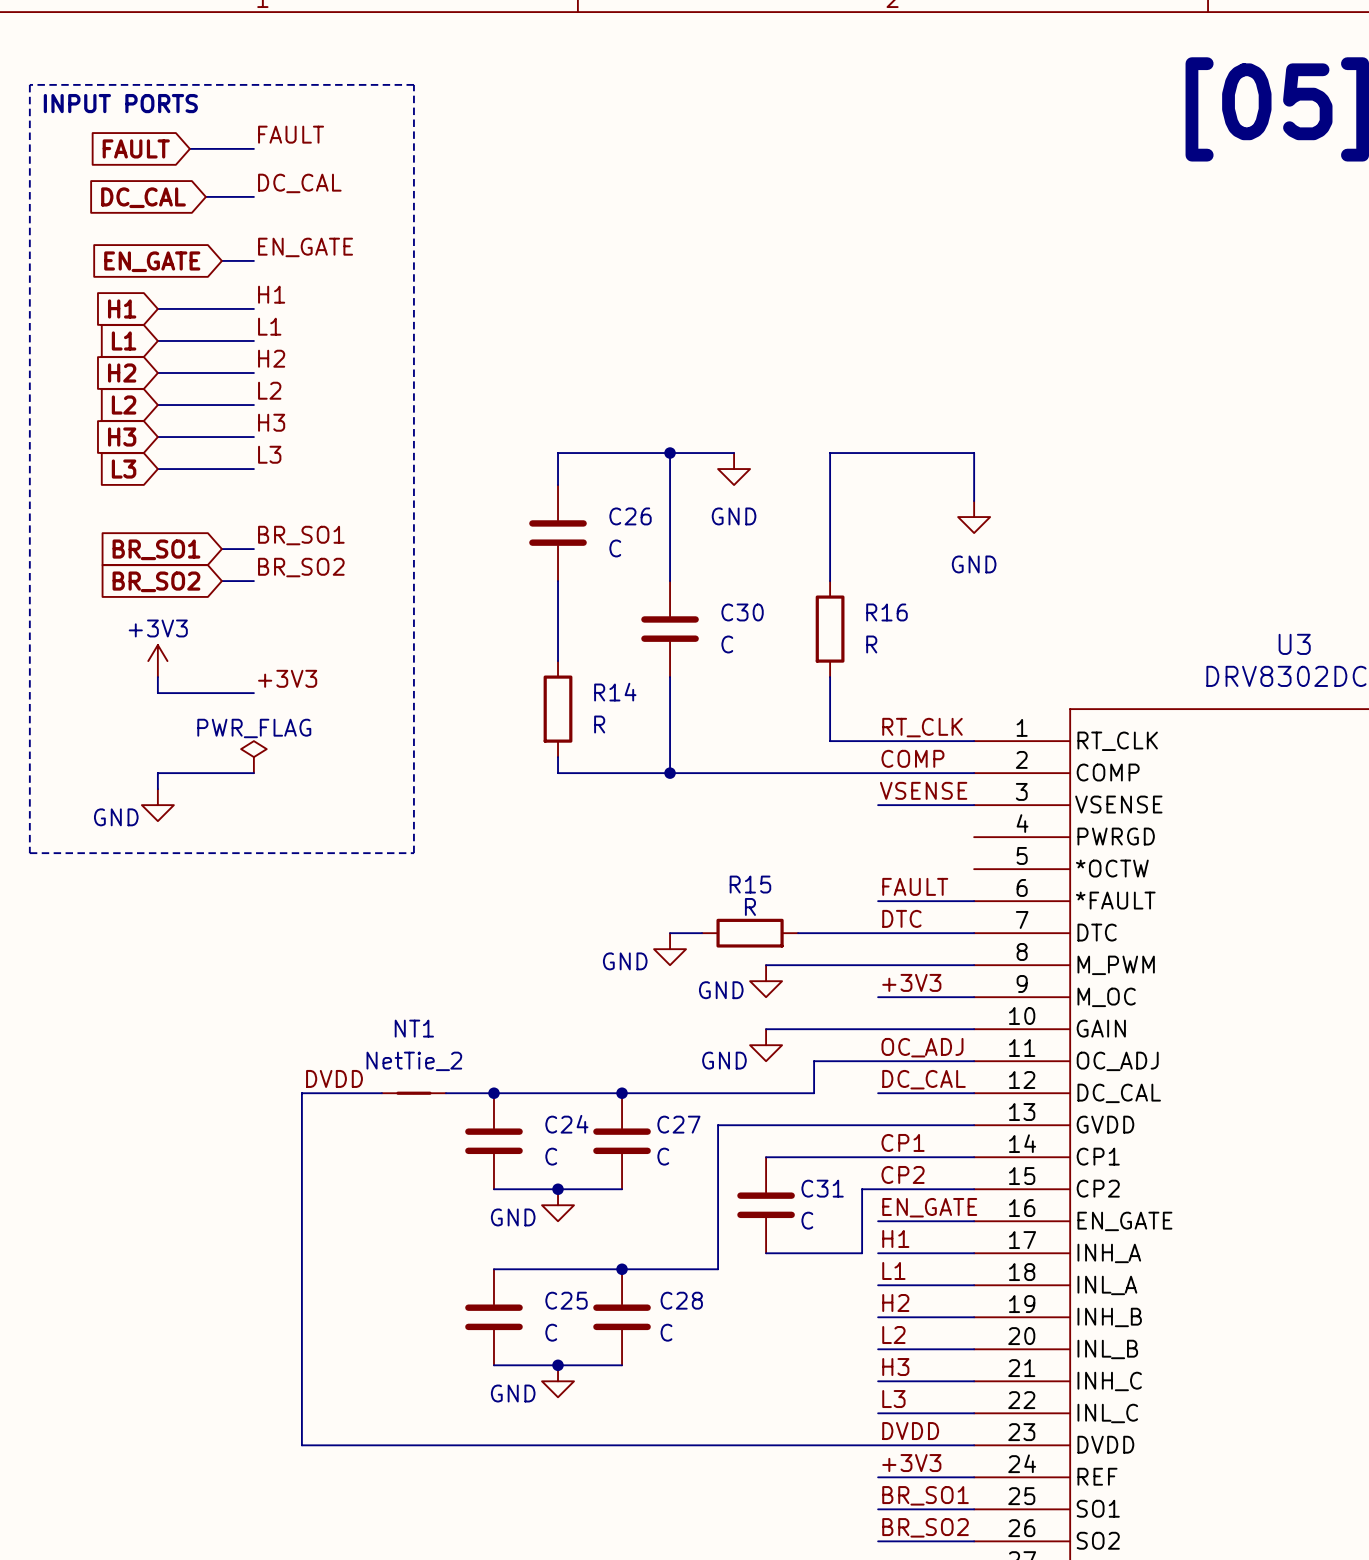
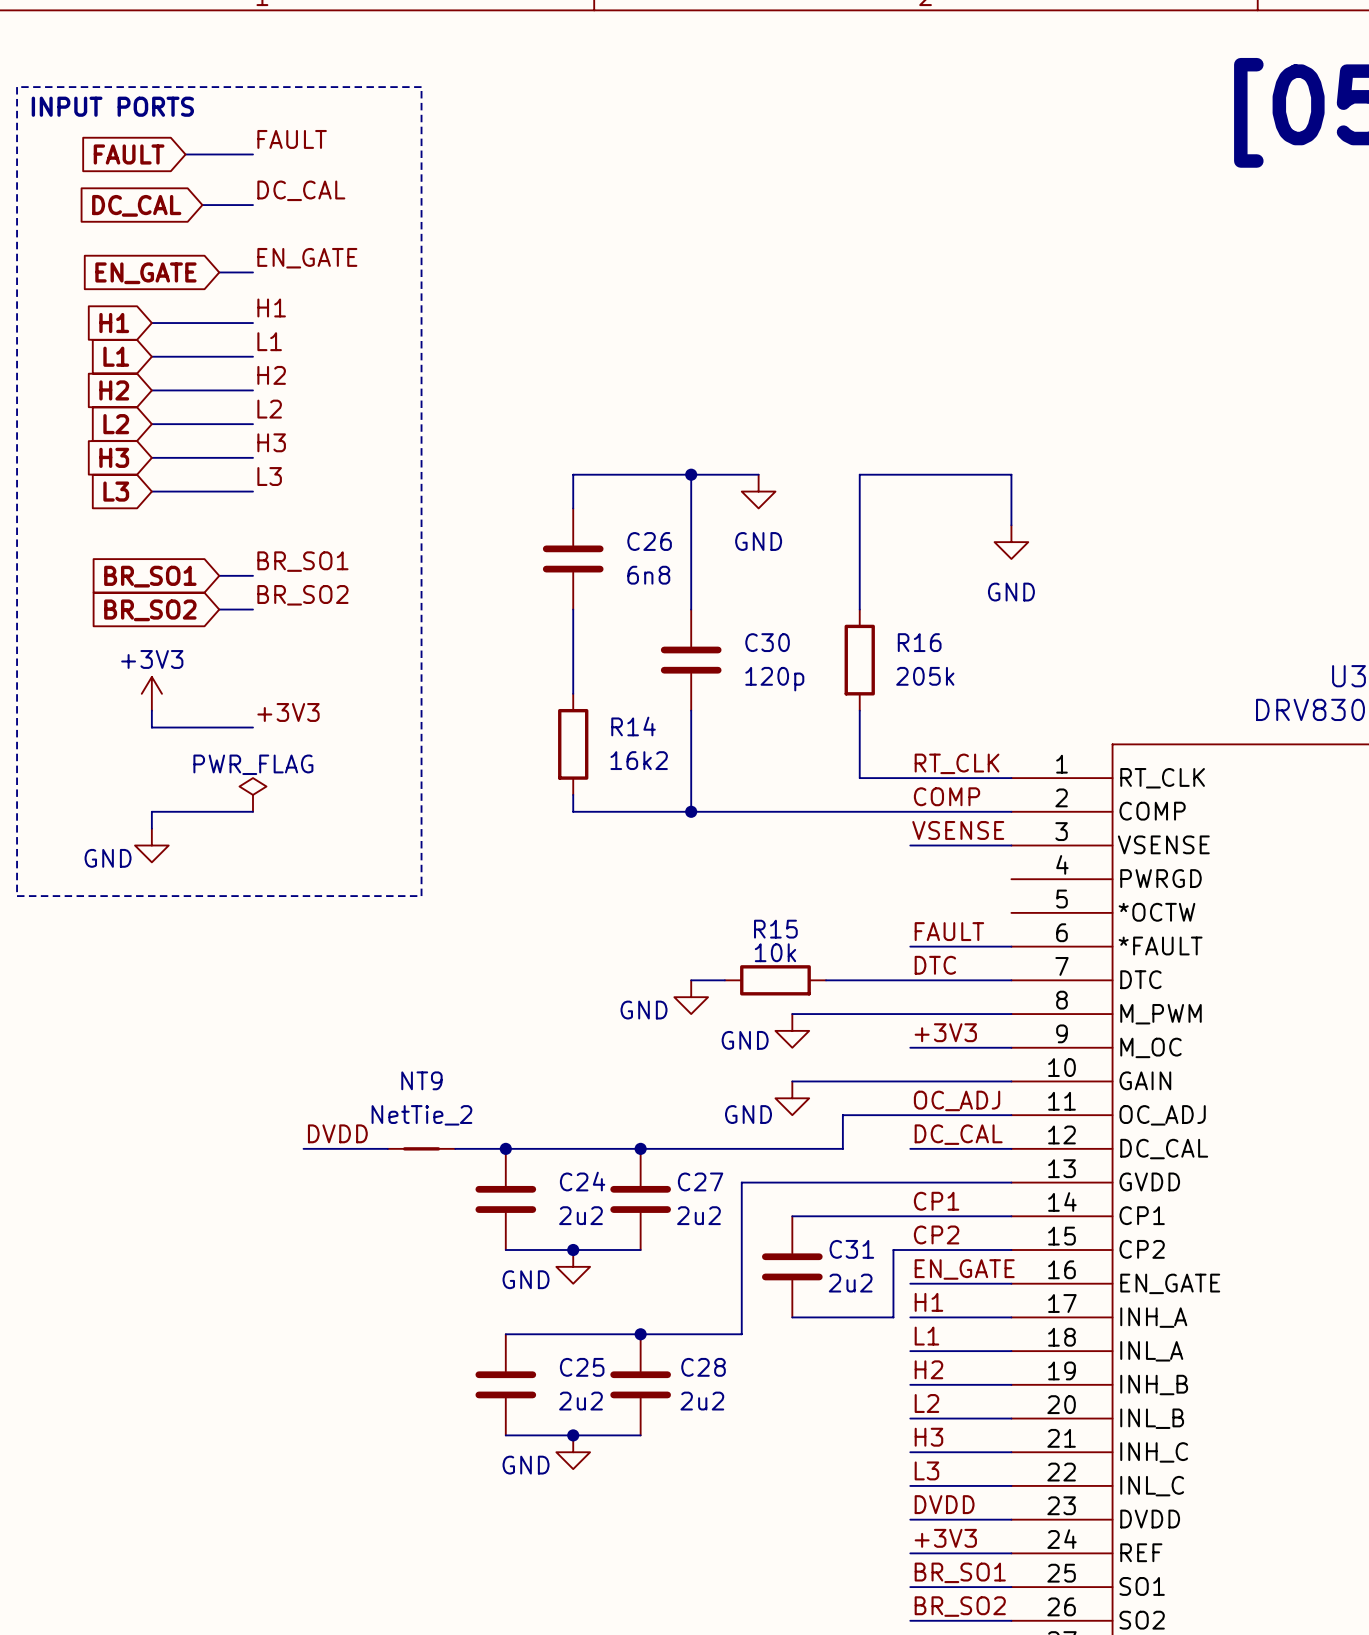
C26 value: C (615, 548) -> 6n8 (648, 575)
C30 value: C (727, 644) -> 120p (774, 679)
R16 value: R (871, 644) -> 205k (925, 676)
R14 value: R (599, 724) -> 16k2 (639, 760)
R15 value: R (750, 906) -> 10k (775, 952)
NT1 name: NT1 (414, 1028) -> NT9 (421, 1080)
wire: (301, 1093) (301, 1445) (878, 1445) -> none
C24 value: C (551, 1156) -> 2u2 (580, 1215)
C27 value: C (663, 1156) -> 2u2 (698, 1215)
C31 value: C (807, 1220) -> 2u2 (850, 1283)
C25 value: C (551, 1332) -> 2u2 (580, 1401)
C28 value: C (666, 1332) -> 2u2 (702, 1401)

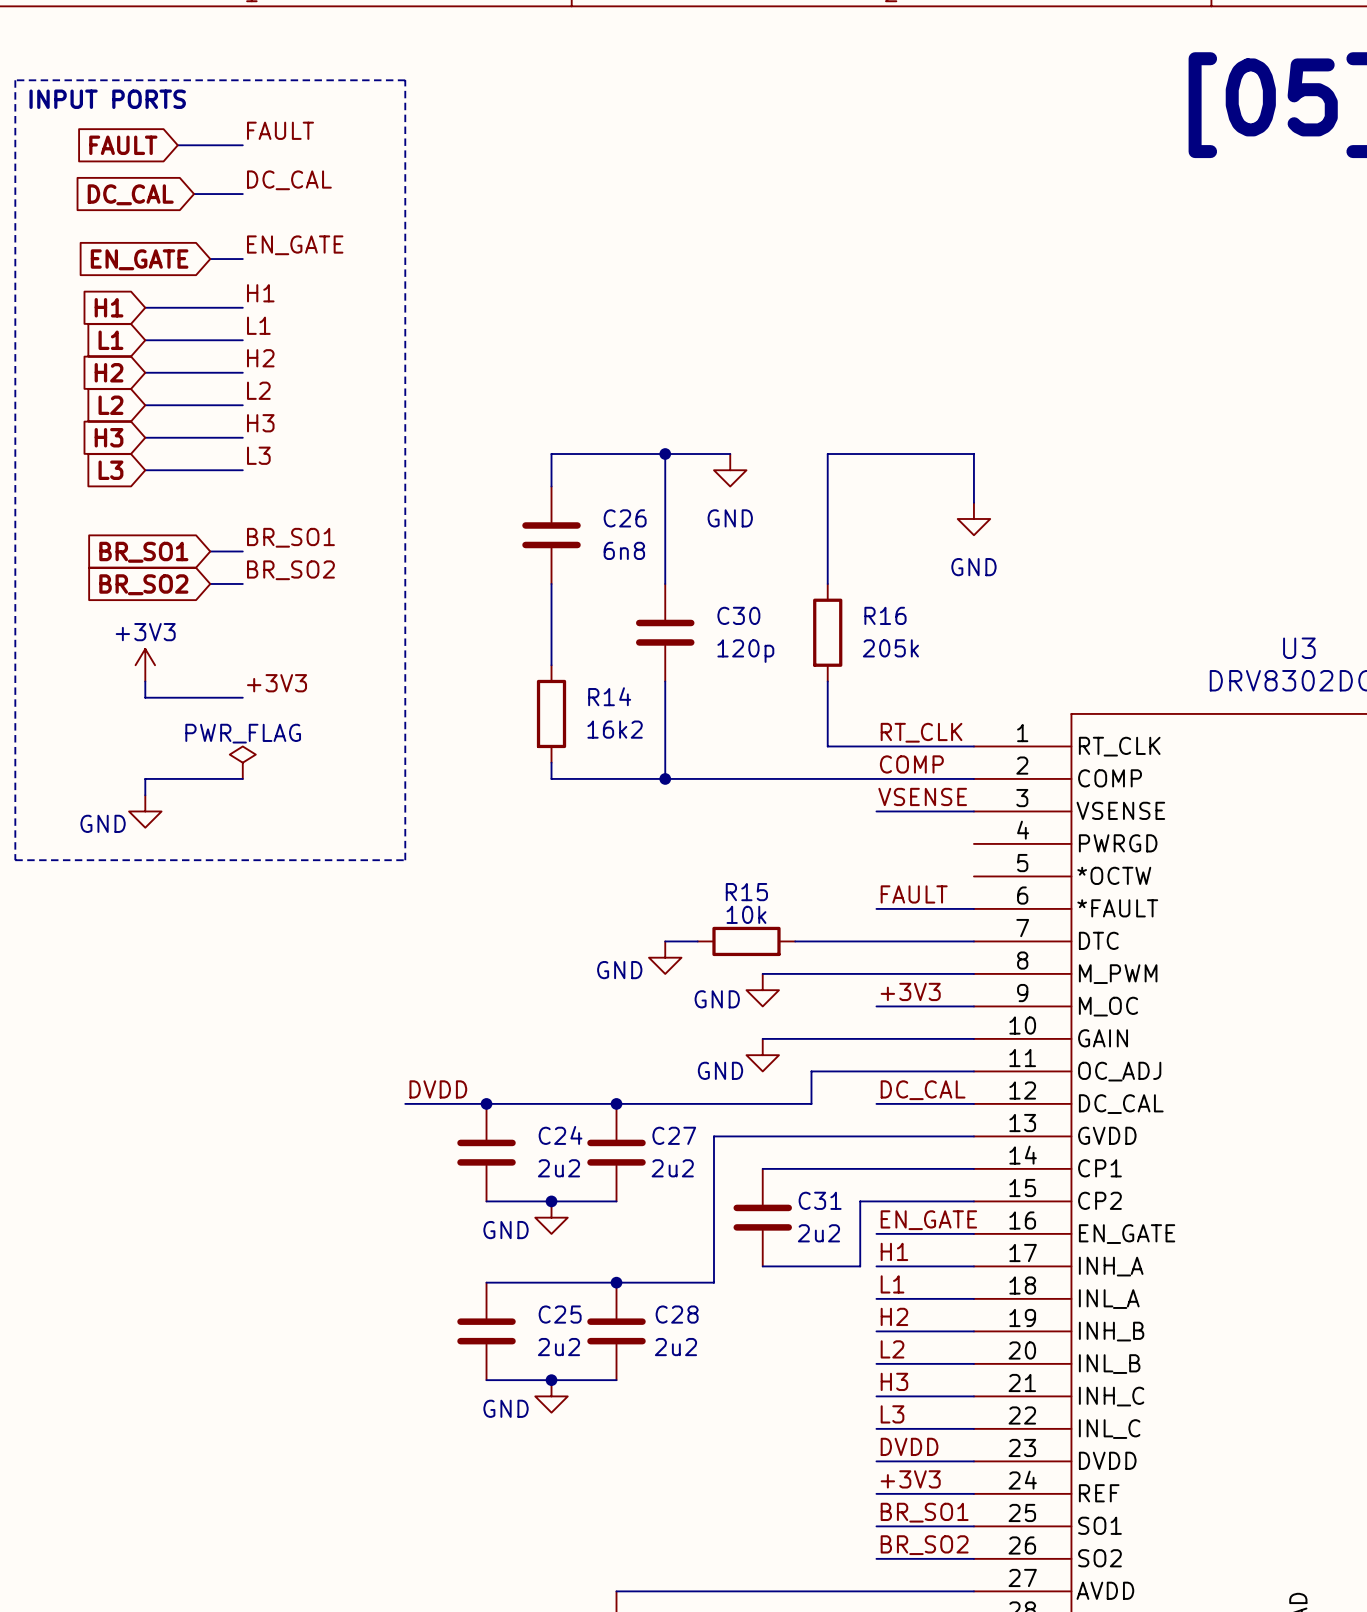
label: DTC (935, 965) -> none
label: OC_ADJ (957, 1100) -> none
label position: DVDD (337, 1133) -> DVDD (438, 1089)
wire: (303, 1148) (387, 1148) -> none
NT9: NetTie_2 (421, 1148) -> none
label: CP1 (936, 1201) -> none
label: CP2 (936, 1234) -> none

